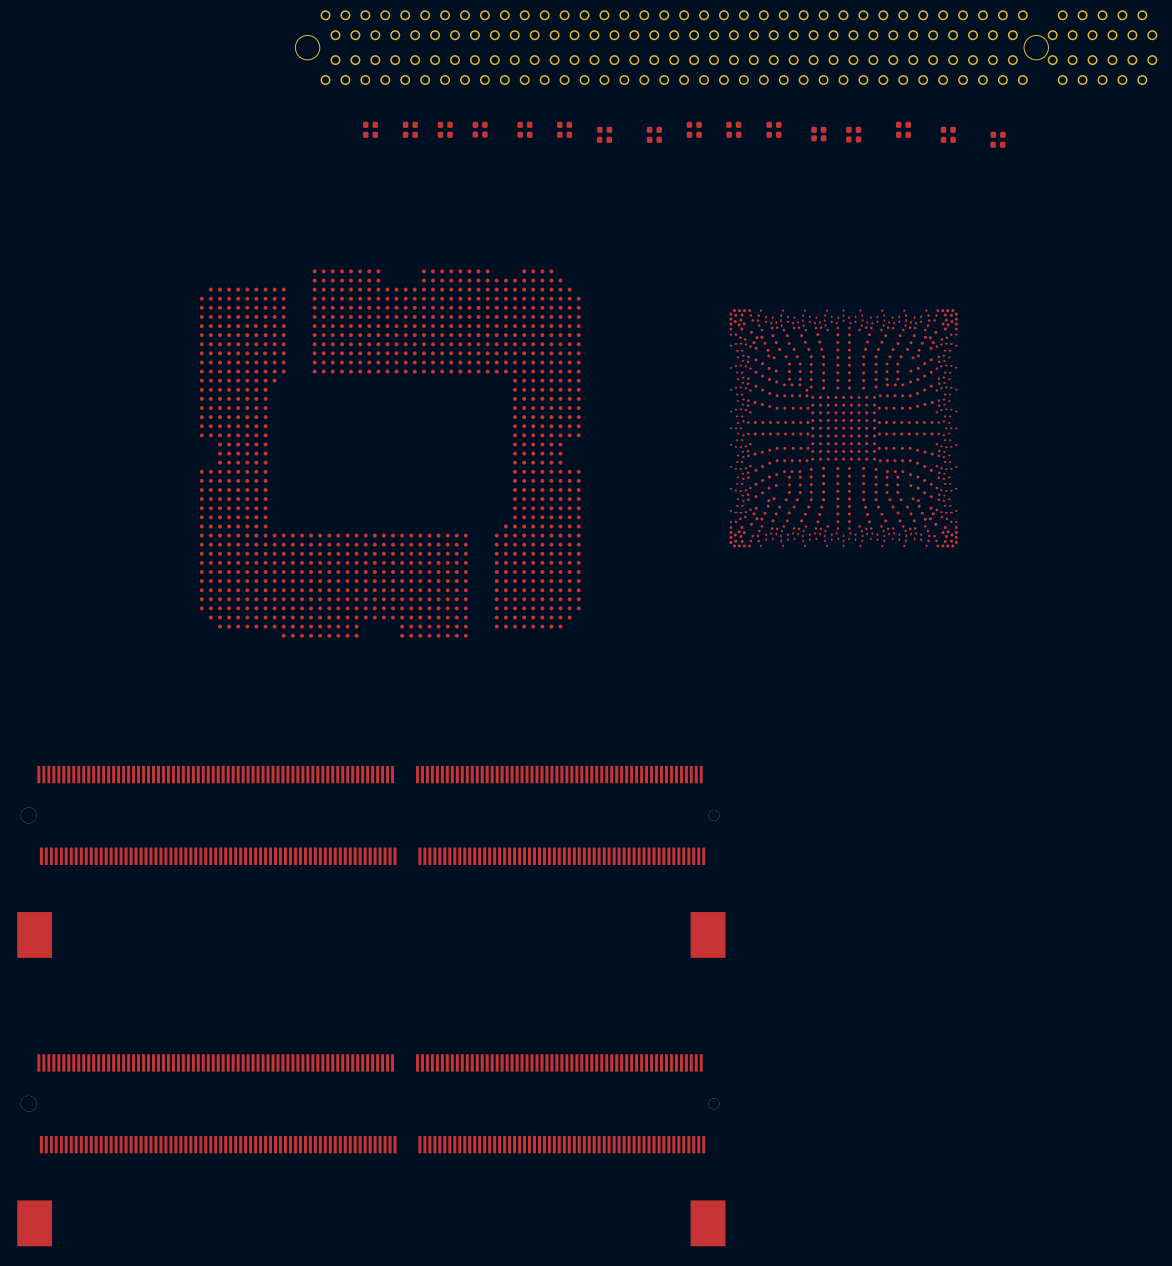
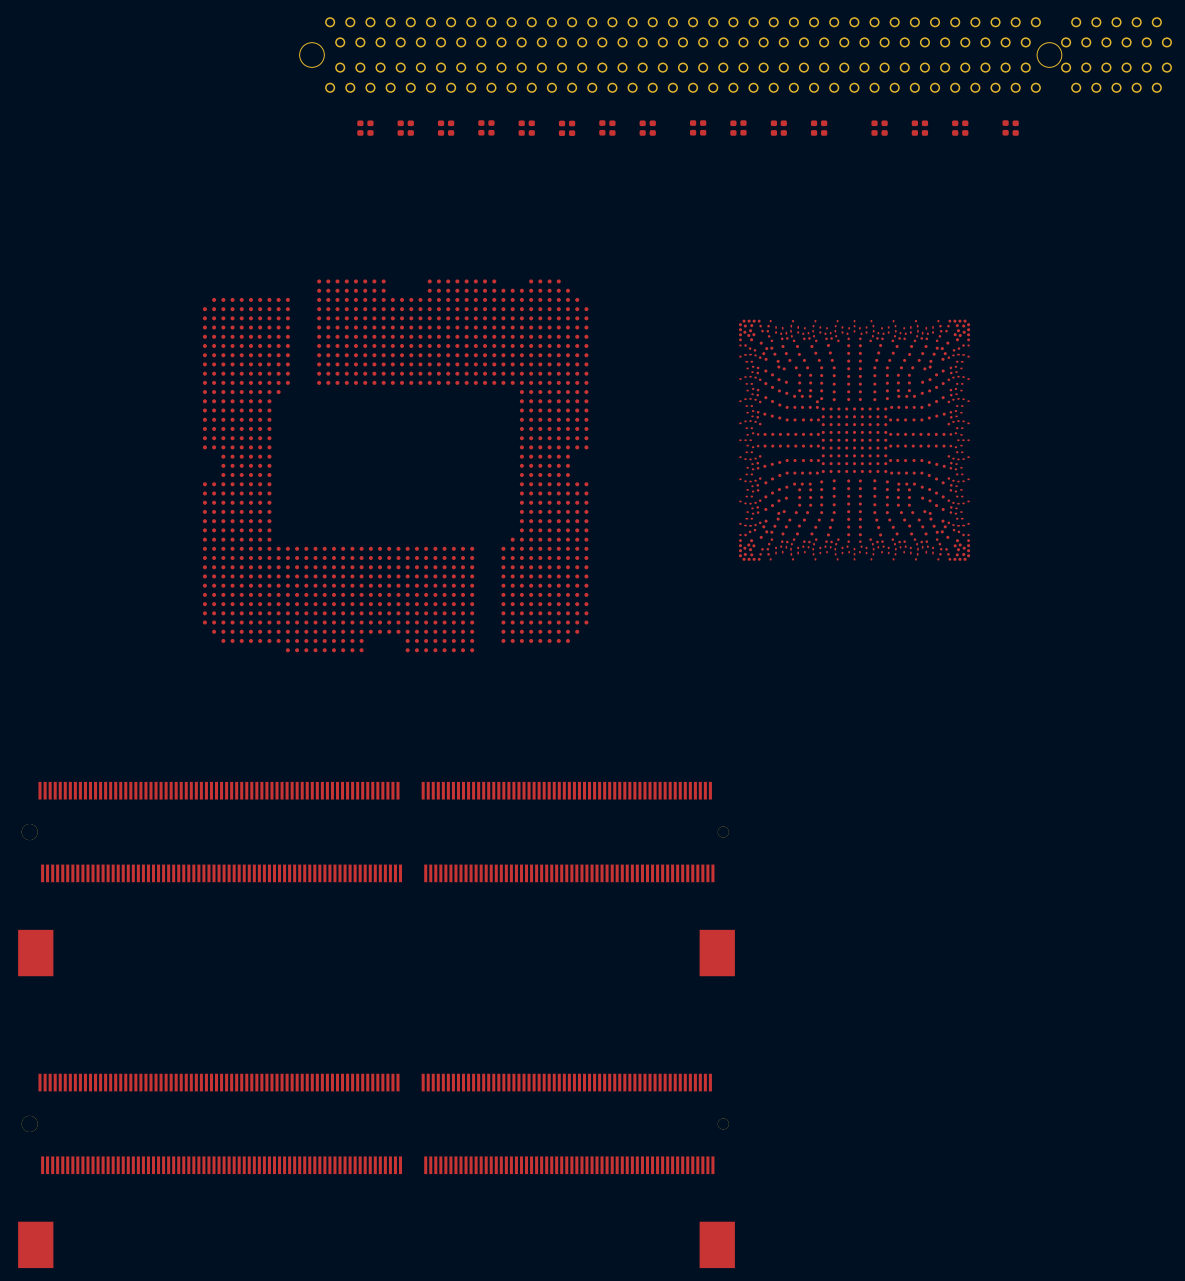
part: none -> (360, 128)
part: none -> (400, 128)
part: none -> (441, 128)
part: none -> (481, 127)
part: none -> (491, 127)
part: none -> (521, 128)
part: none -> (602, 127)
part: none -> (612, 128)
part: none -> (642, 128)
part: none -> (652, 128)
part: none -> (693, 127)
part: none -> (733, 128)
part: none -> (773, 128)
part: none -> (814, 128)
part: none -> (824, 128)
part: none -> (874, 128)
part: none -> (884, 128)
part: none -> (924, 128)
part: none -> (955, 128)
part: none -> (965, 128)
part: none -> (1005, 127)
part: none -> (1015, 128)
part: none -> (562, 128)
part rotation: 0° (370, 124) -> 90° clockwise (370, 128)
part rotation: 0° (410, 124) -> 90° clockwise (410, 128)
part rotation: 0° (445, 124) -> 90° clockwise (451, 128)
part: (480, 124) -> none
part rotation: 0° (524, 124) -> 90° clockwise (531, 128)
part rotation: 0° (564, 124) -> 90° clockwise (572, 128)
part rotation: 0° (694, 124) -> 90° clockwise (703, 127)
part rotation: 0° (733, 124) -> 90° clockwise (743, 127)
part rotation: 0° (773, 124) -> 90° clockwise (783, 128)
part rotation: 0° (903, 124) -> 90° clockwise (914, 128)
part: (604, 129) -> none
part: (654, 129) -> none
part: (818, 129) -> none
part: (853, 129) -> none
part: (948, 129) -> none
part: (370, 134) -> none
part: (410, 134) -> none
part: (445, 134) -> none
part: (480, 134) -> none
part: (524, 134) -> none
part: (564, 134) -> none
part: (694, 134) -> none
part: (733, 134) -> none
part: (773, 134) -> none
part: (903, 134) -> none
part: (998, 134) -> none
part: (818, 138) -> none
part: (604, 139) -> none
part: (654, 139) -> none
part: (853, 139) -> none
part: (948, 139) -> none
part: (997, 144) -> none

